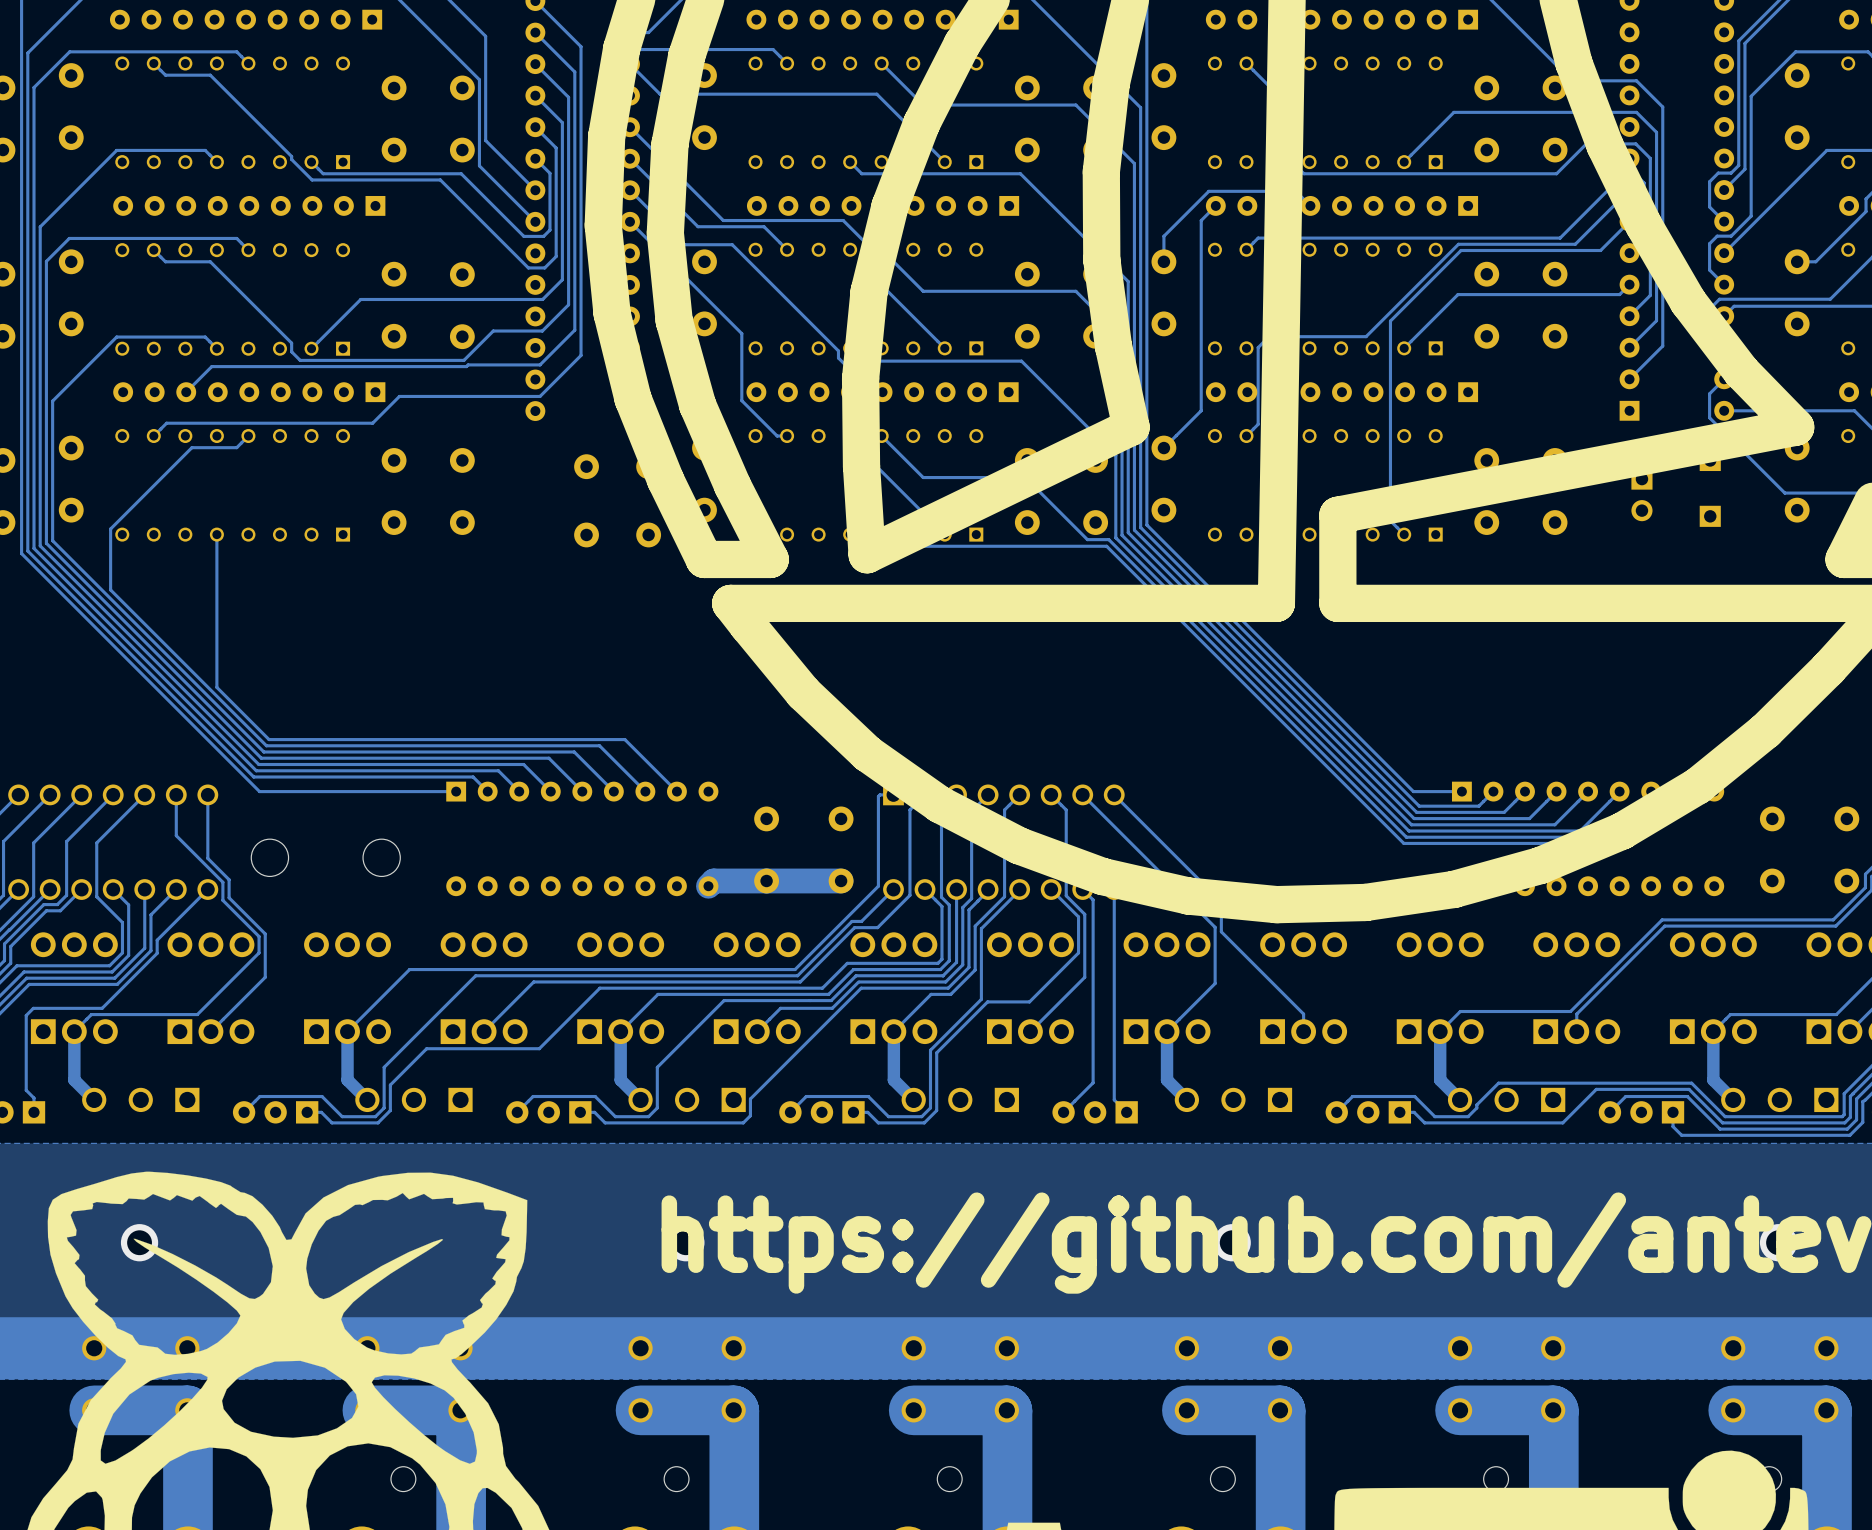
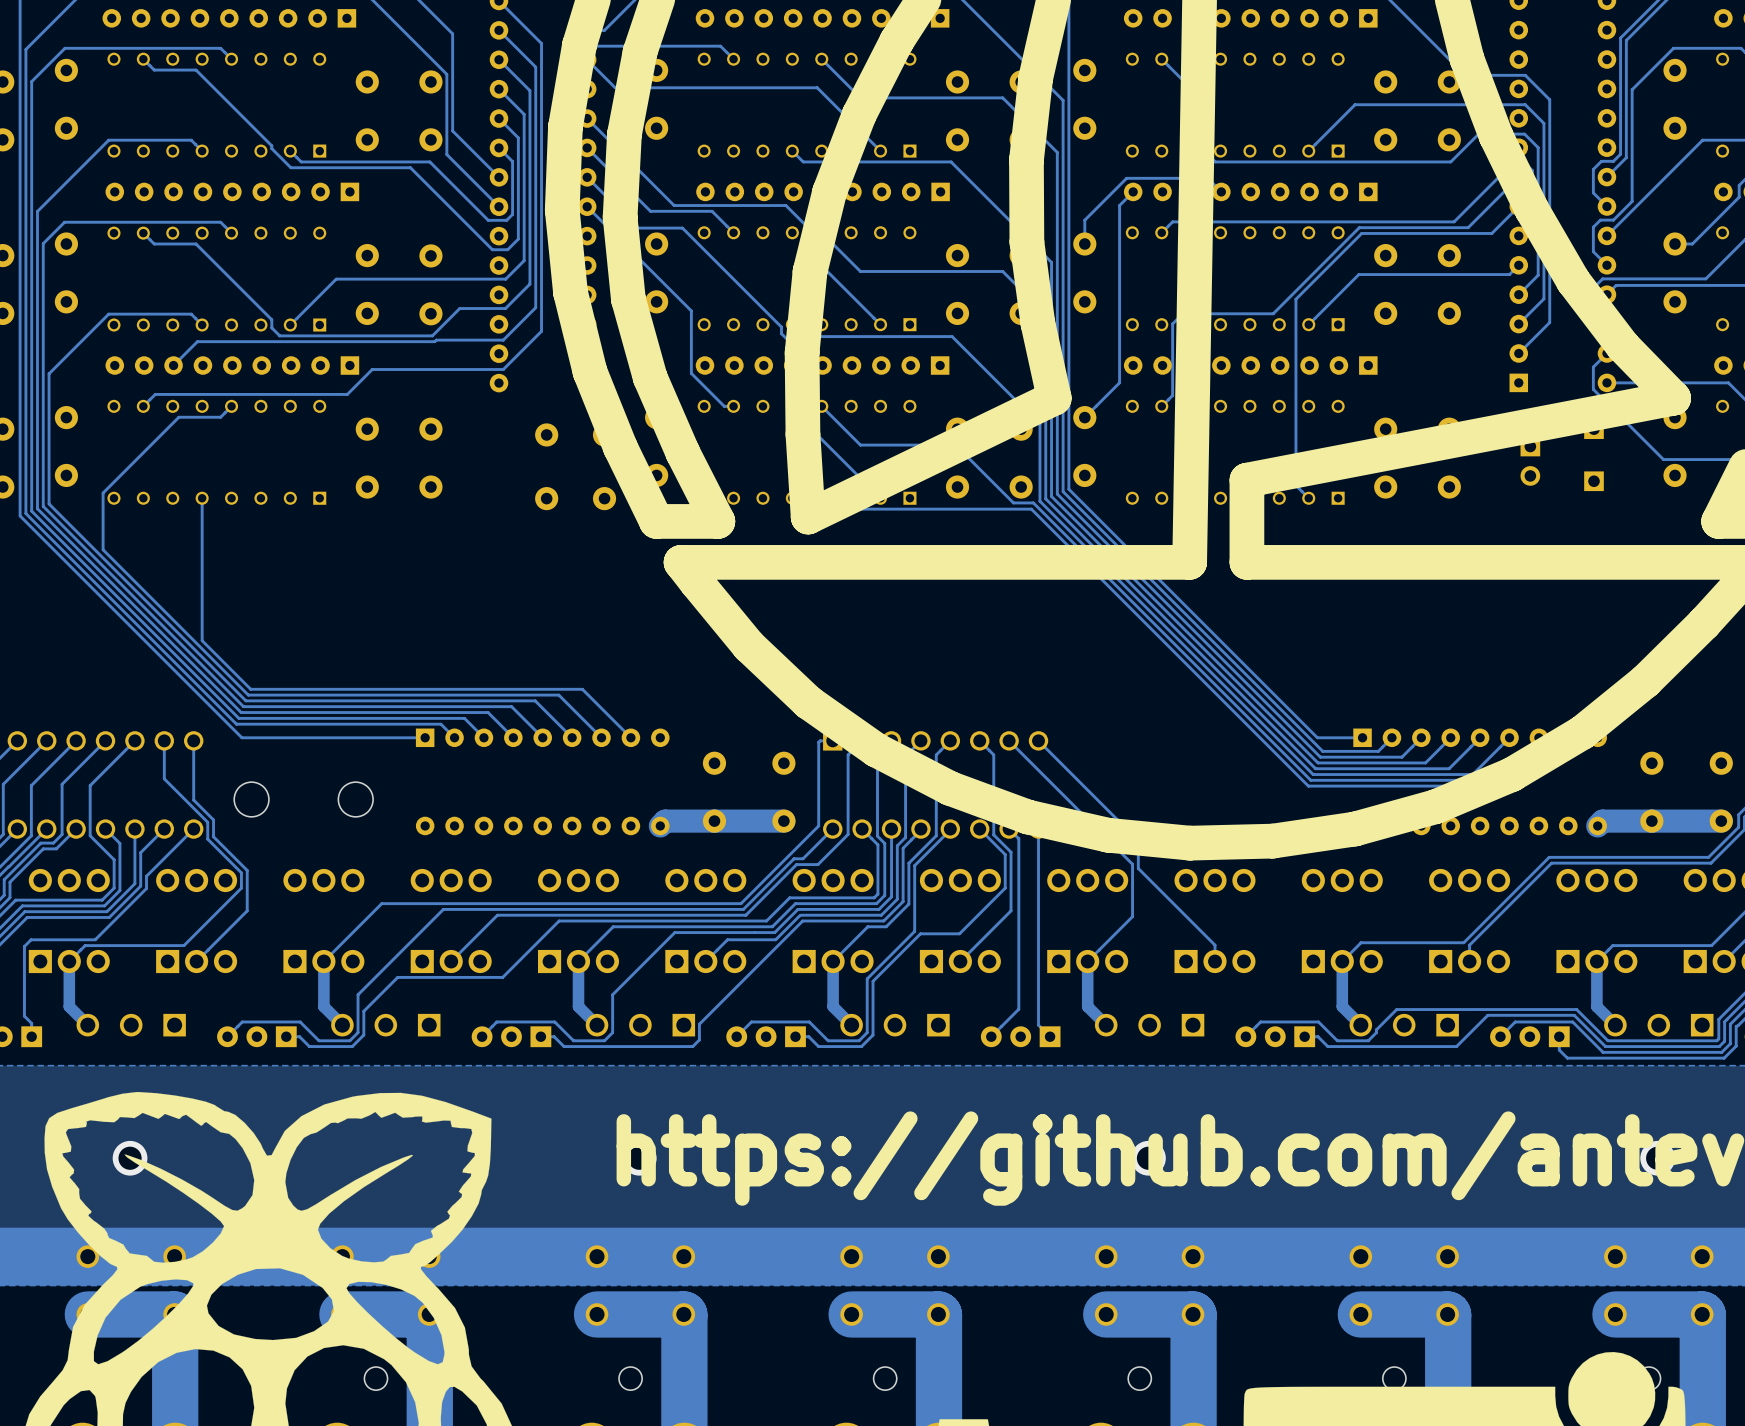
track: none -> (1721, 821) (1602, 821) (1597, 825)

